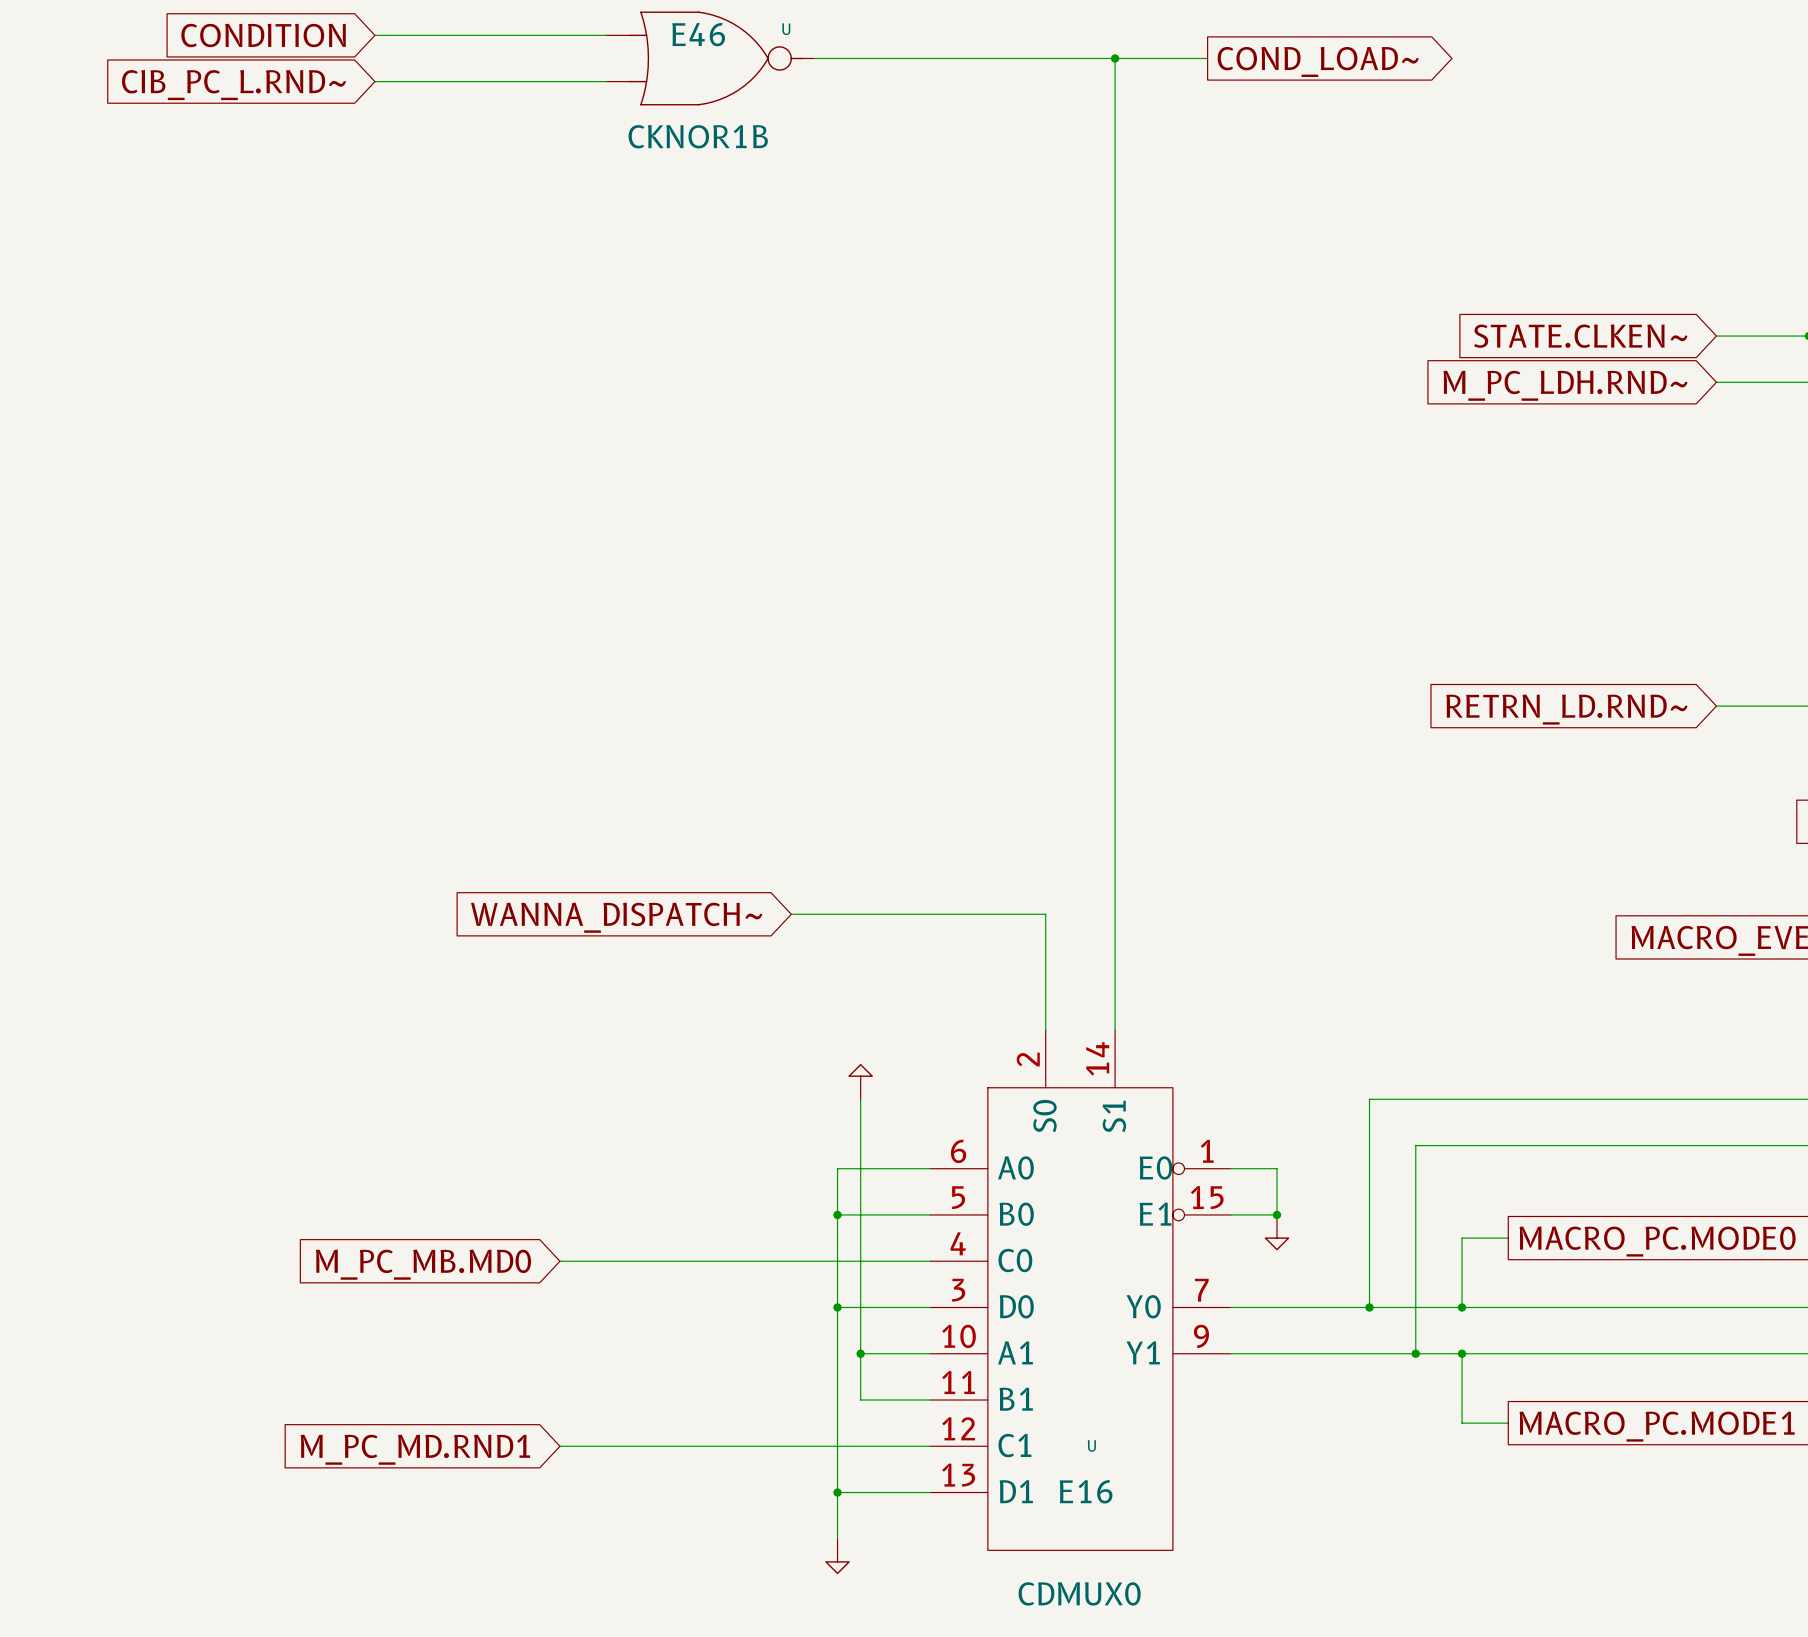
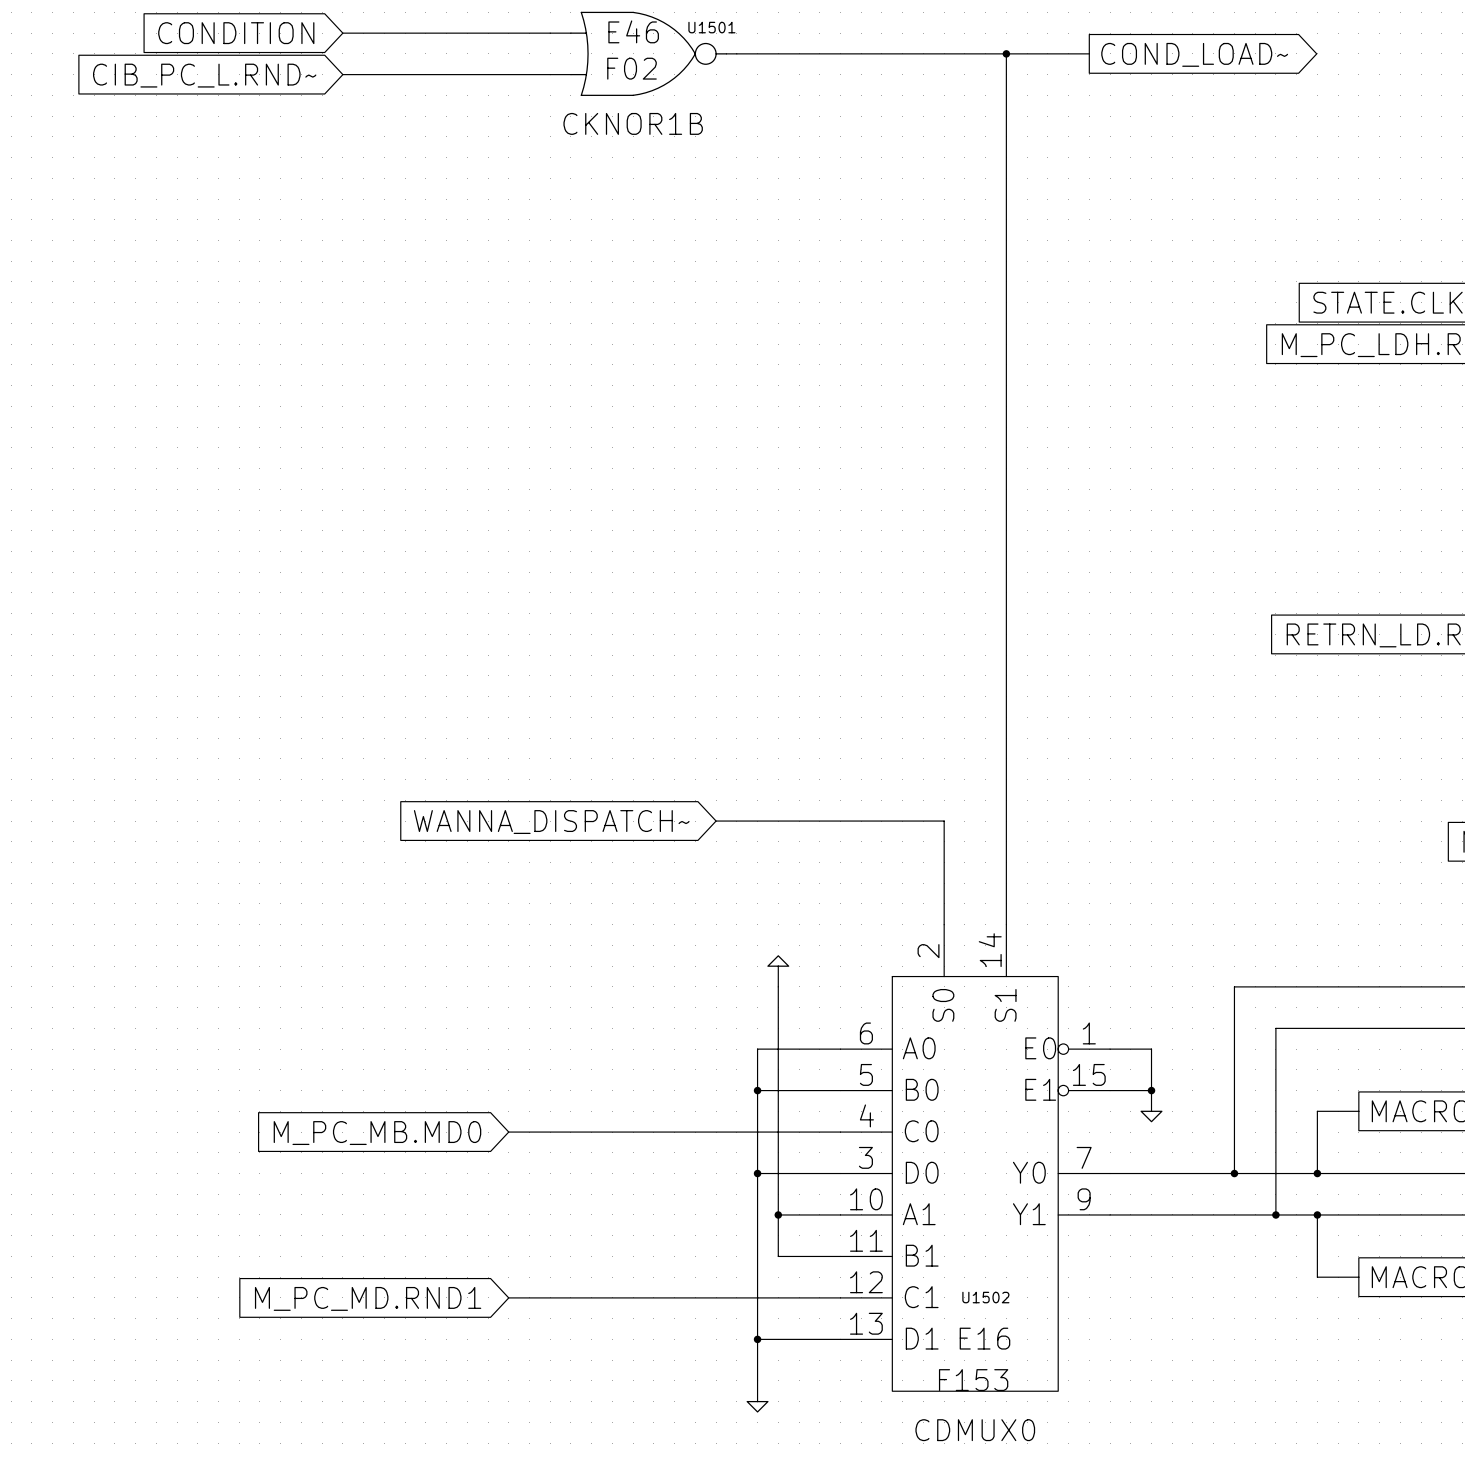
U name: U (786, 29) -> U1501 (711, 27)
U value: none -> F02 (632, 68)
U name: U (1091, 1445) -> U1502 (985, 1297)
U value: none -> F153 (973, 1380)

